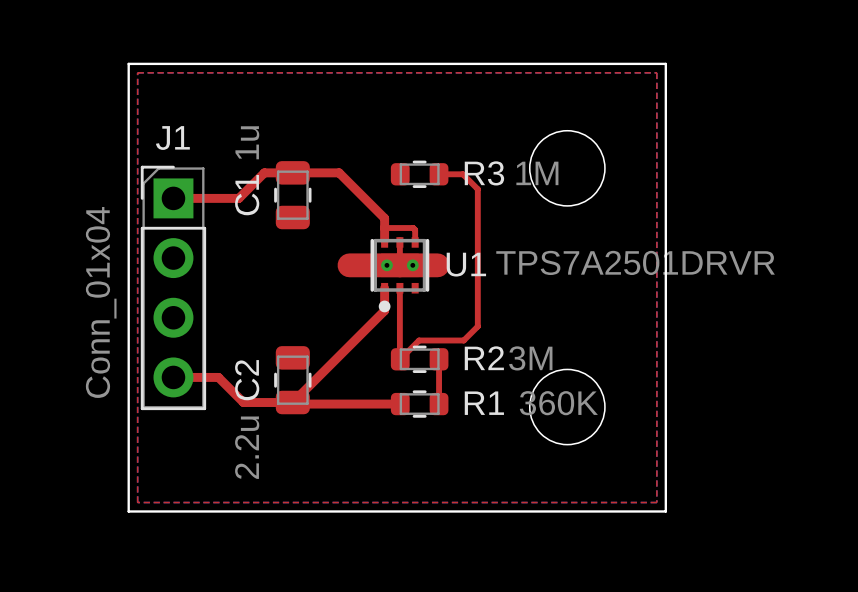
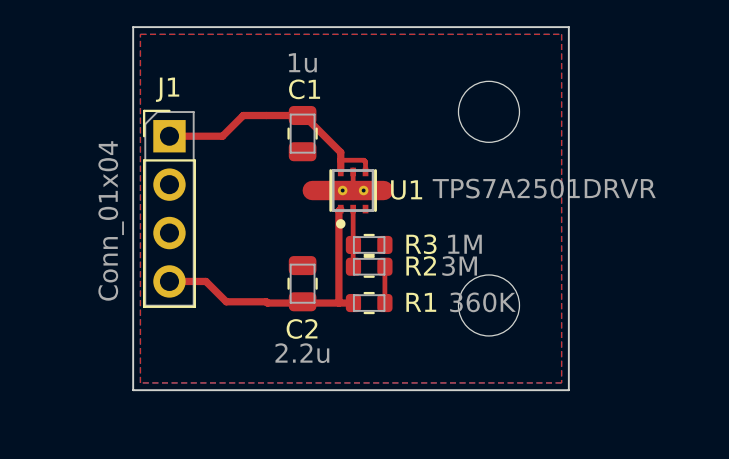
C1 value rotation: 0° (247, 142) -> 90° clockwise (302, 62)
R3 position: (419, 174) -> (369, 244)
top track: (439, 174) (462, 174) (477, 189) (477, 326) (463, 340) (419, 340) (400, 359) -> none
C1 name rotation: 0° (247, 195) -> 90° clockwise (304, 89)
C1 name position: C1 (247, 195) -> C1 (304, 89)
C1 position: (292, 195) -> (302, 133)
top track: (384, 288) (384, 310) (292, 402) -> (340, 209) (338, 210) (338, 303)
C2 name rotation: 0° (247, 380) -> 90° clockwise (302, 328)
C2 name position: C2 (247, 380) -> C2 (302, 328)
C2 position: (292, 380) -> (302, 283)
C2 value rotation: 0° (247, 447) -> 90° clockwise (302, 353)

